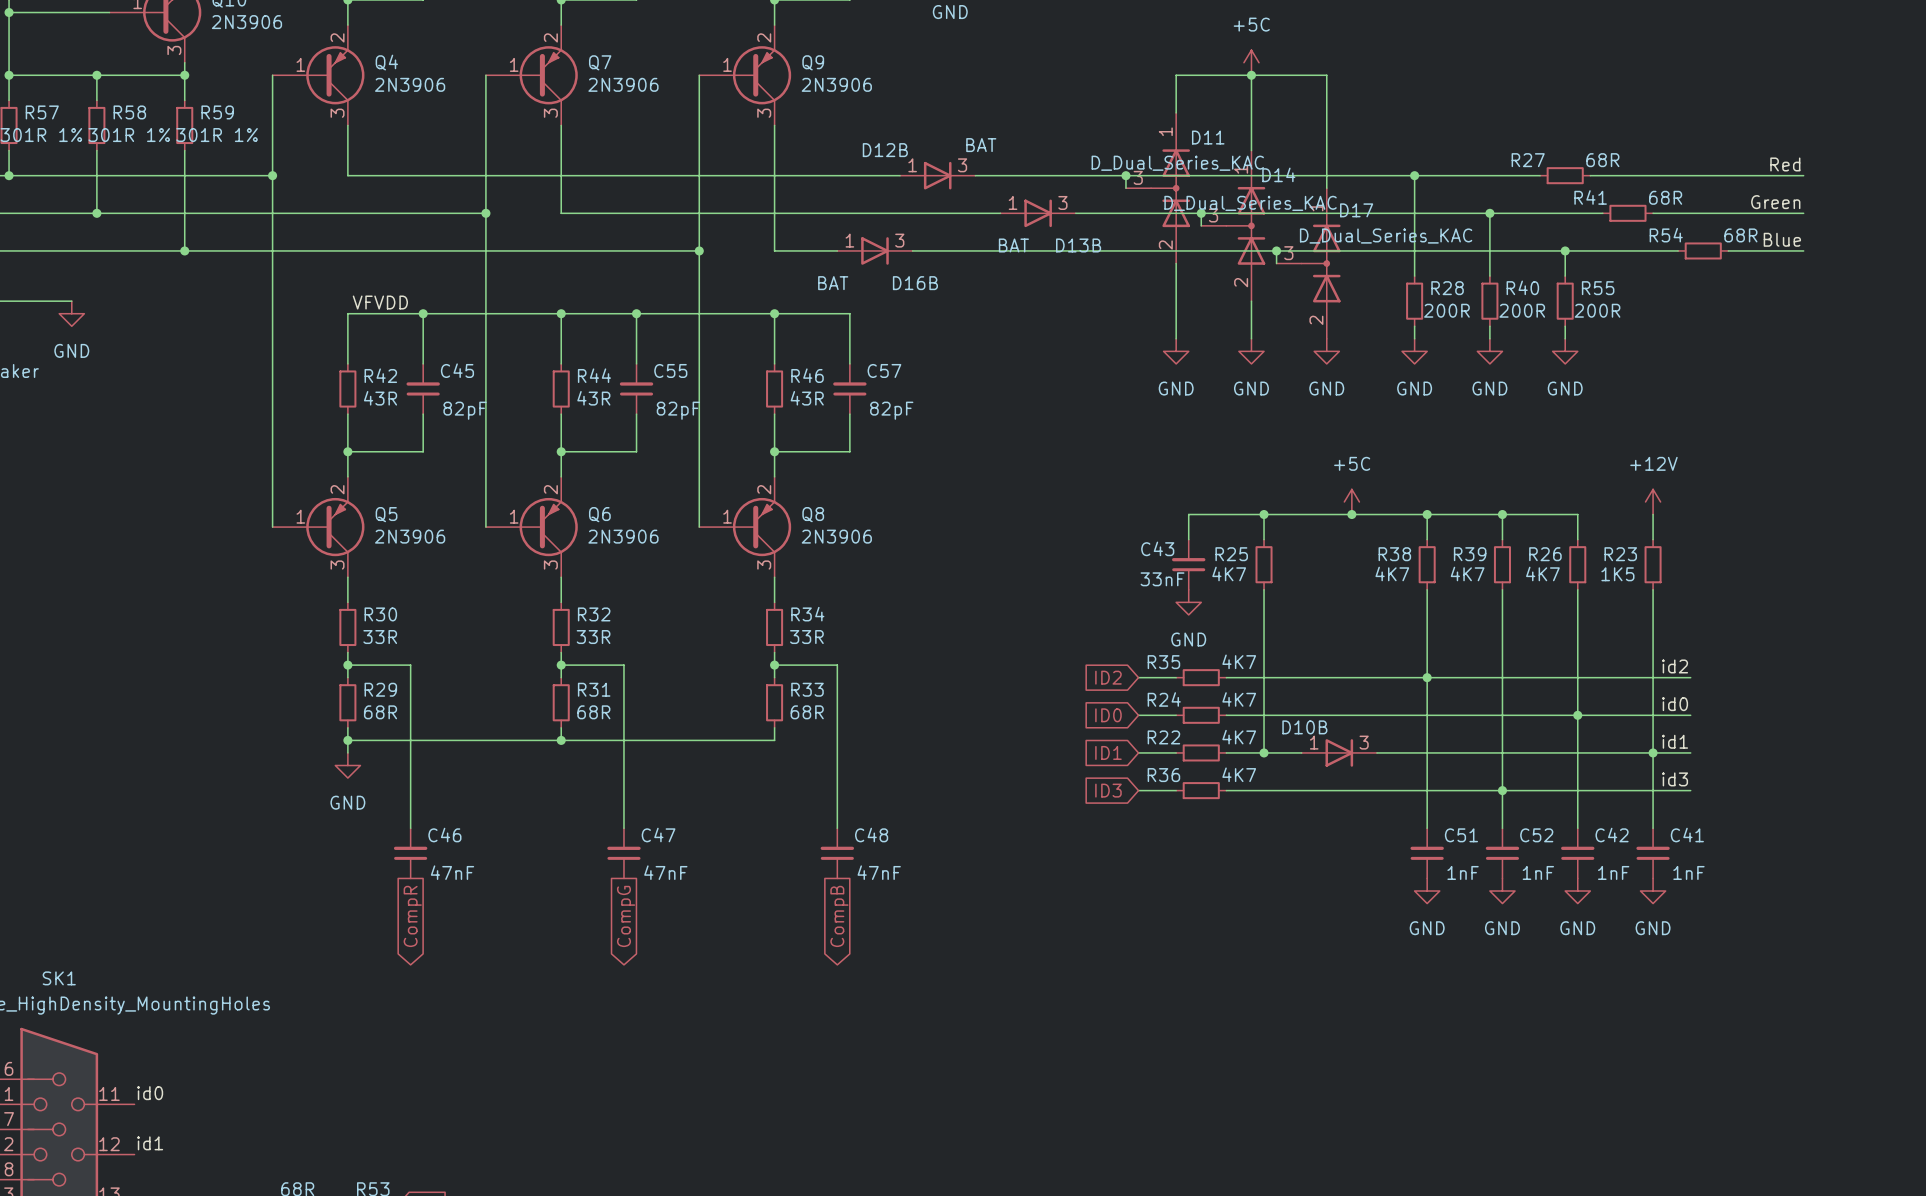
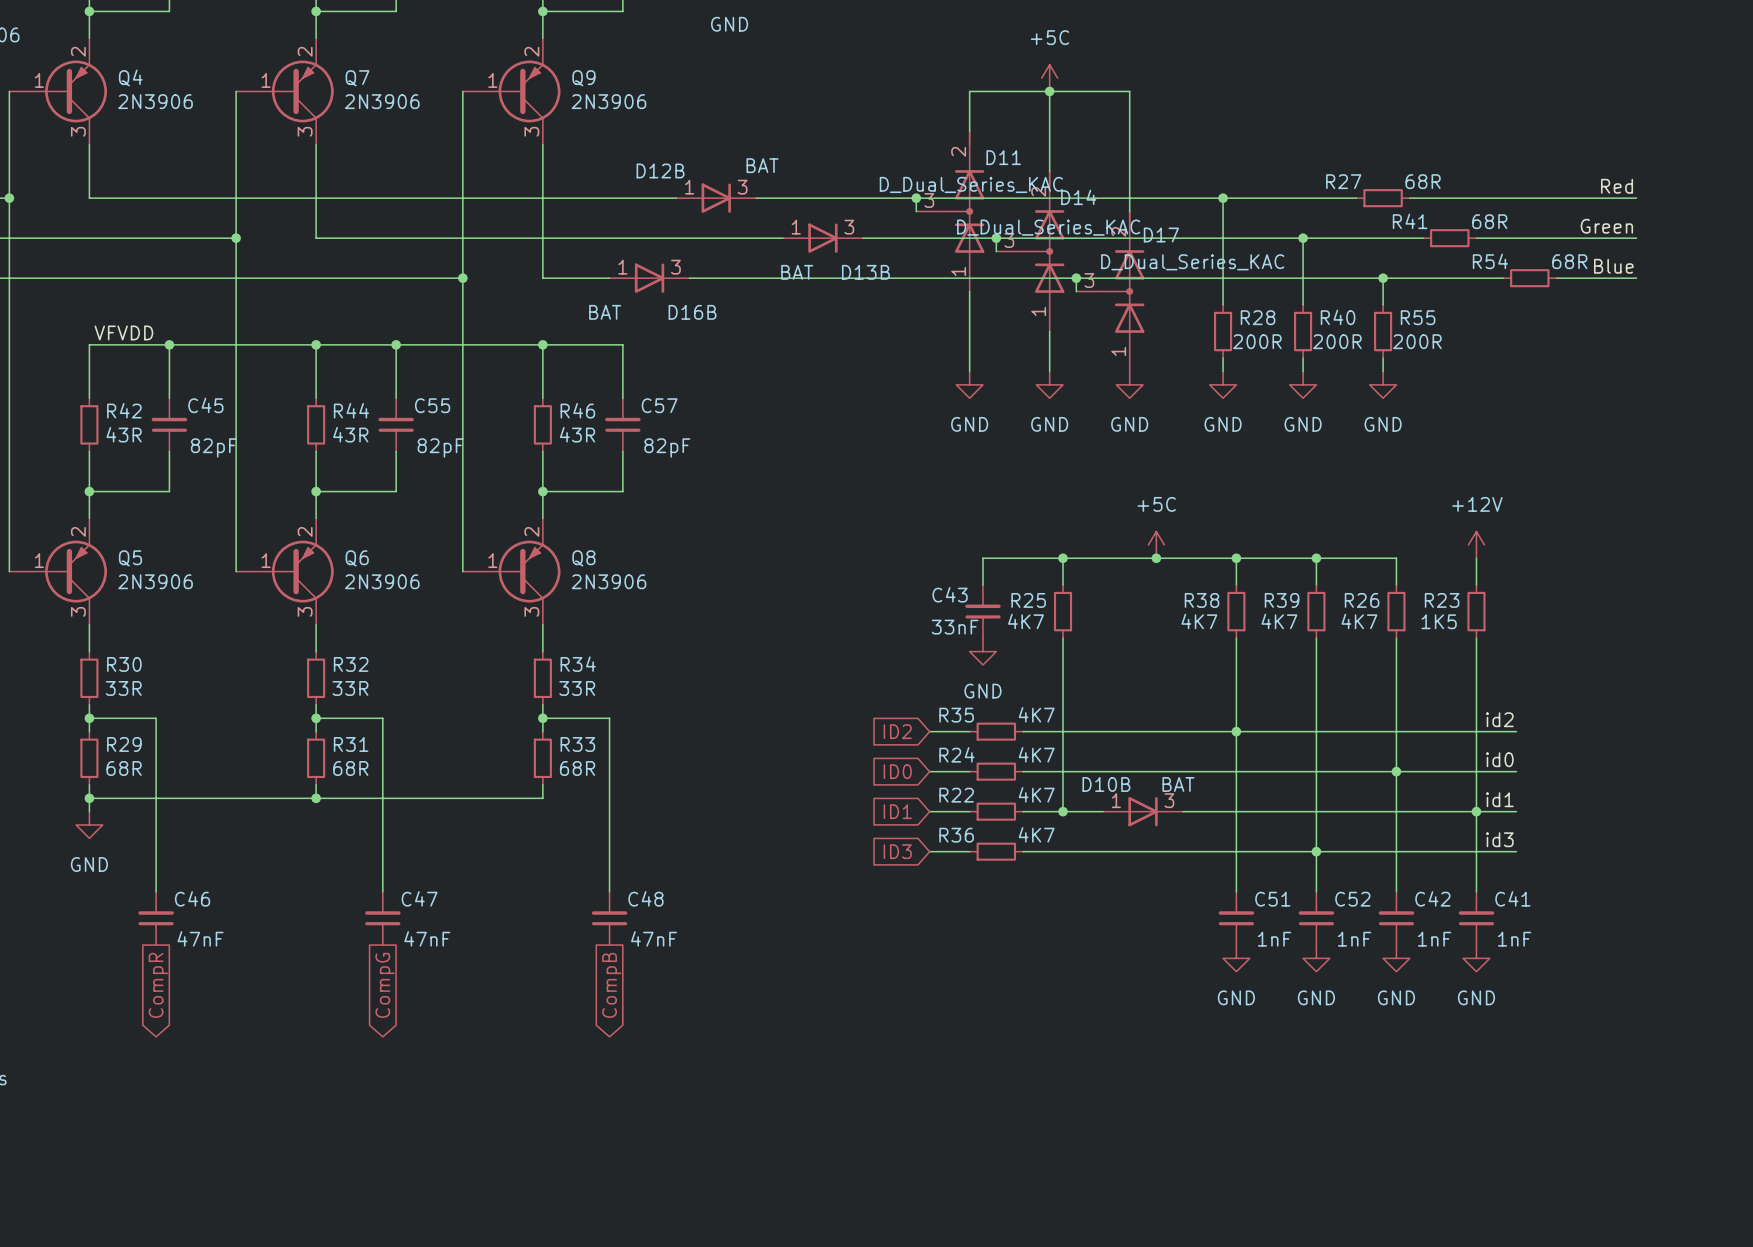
D11 symbol: [1125, 112, 1190, 264] -> [916, 131, 985, 292]
D14 symbol: [1201, 150, 1266, 302] -> [996, 171, 1065, 332]
D17 symbol: [1276, 188, 1341, 339] -> [1076, 211, 1145, 372]
D10B value: none -> BAT (1178, 784)

